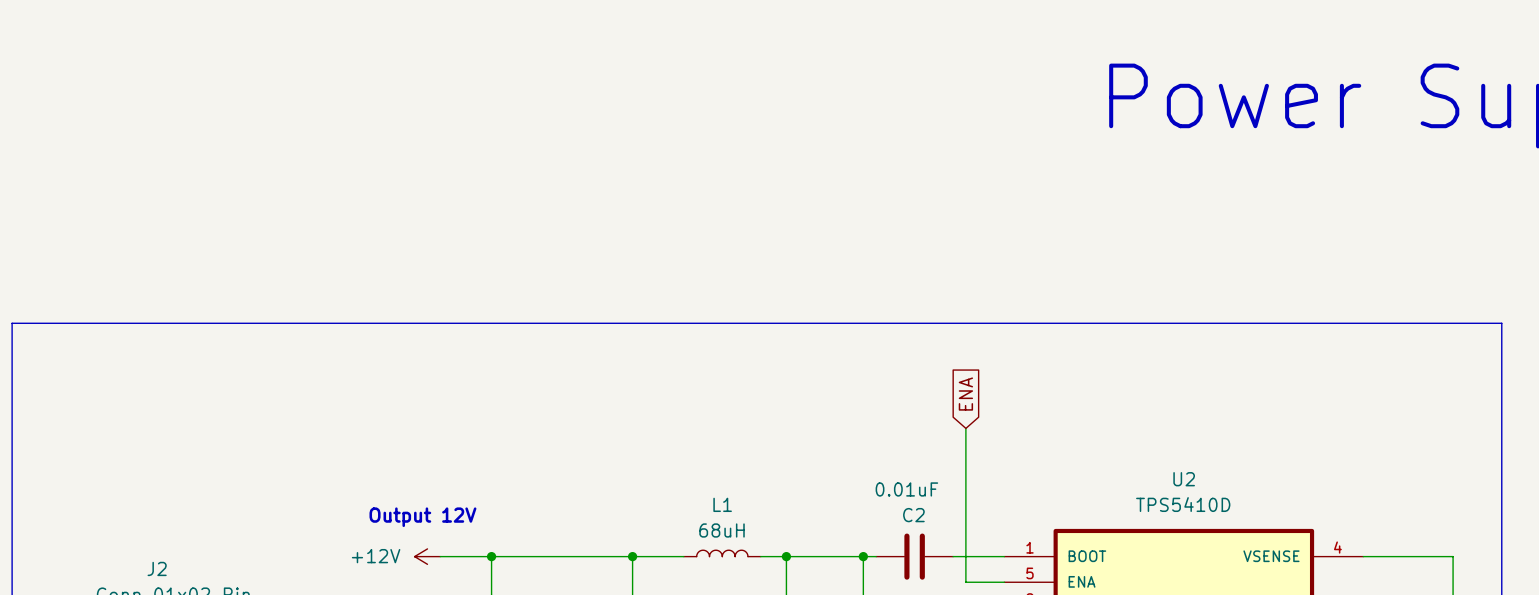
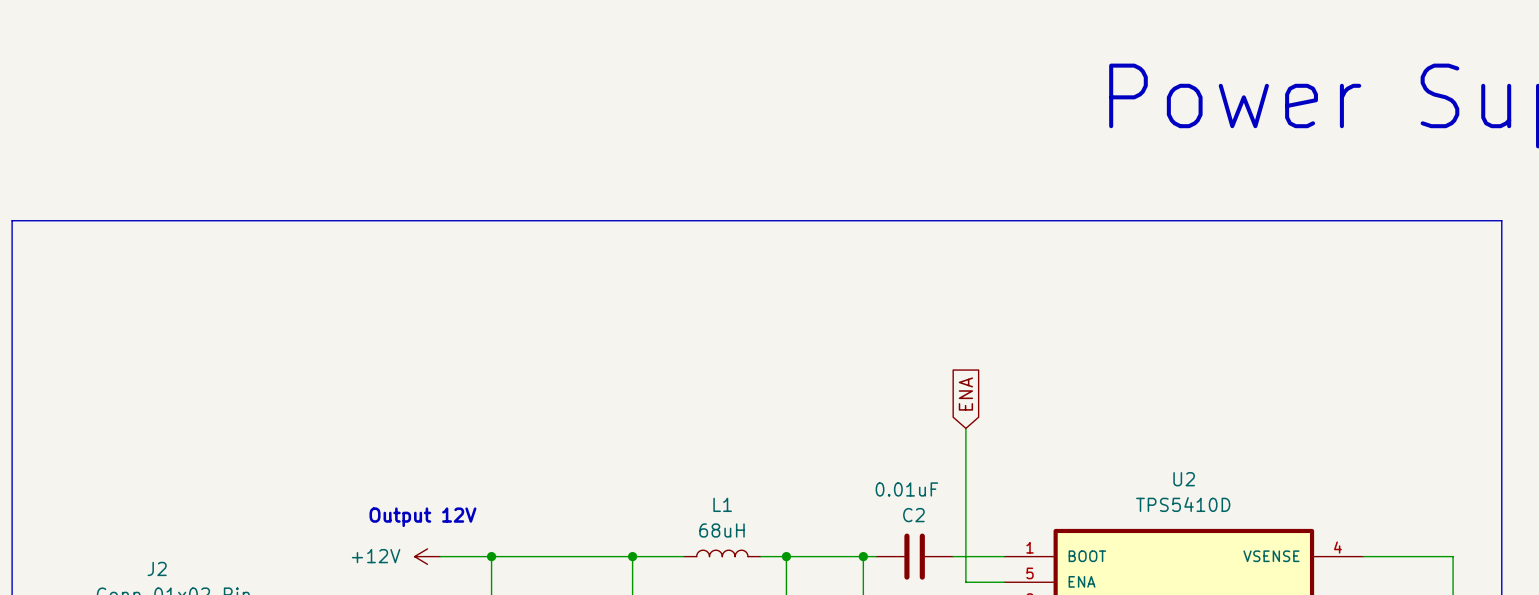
line: (12, 323) (1501, 323) -> (12, 323) (12, 220) (1501, 220) (1501, 323)

